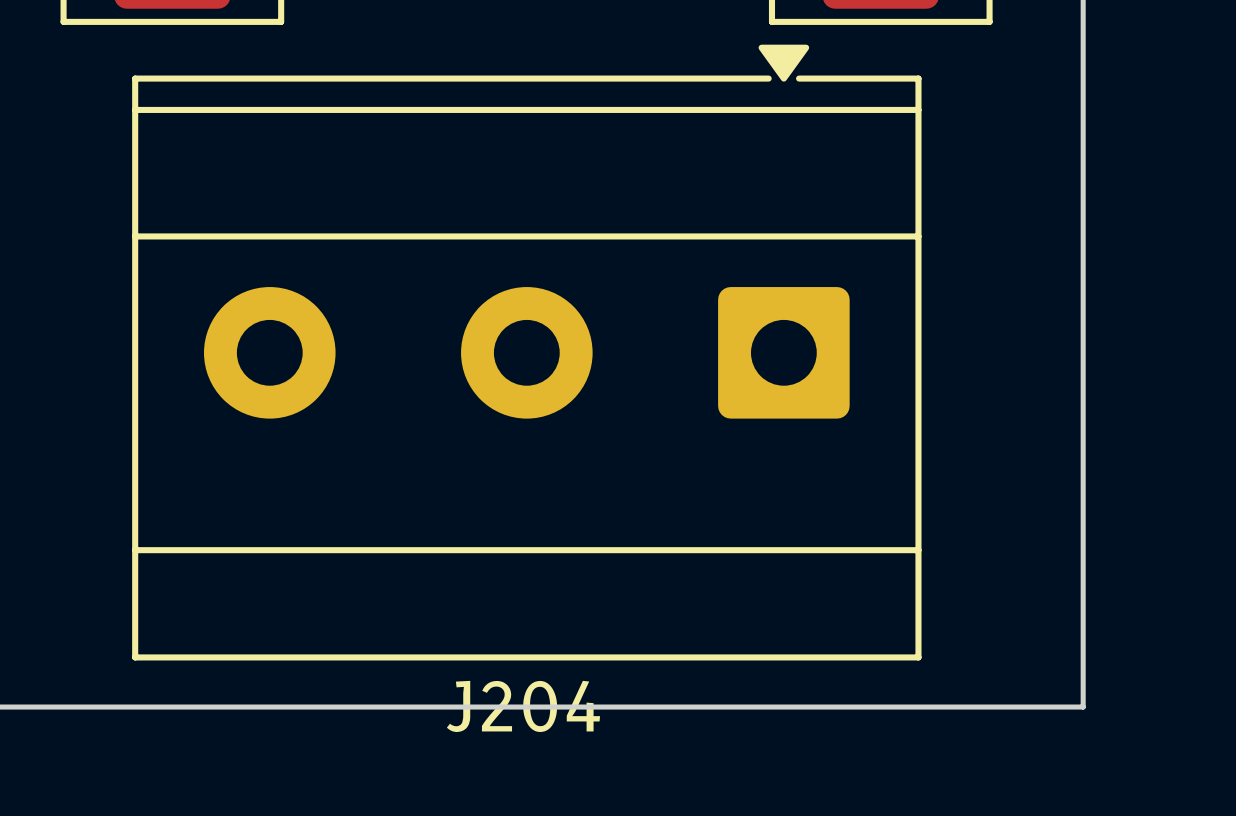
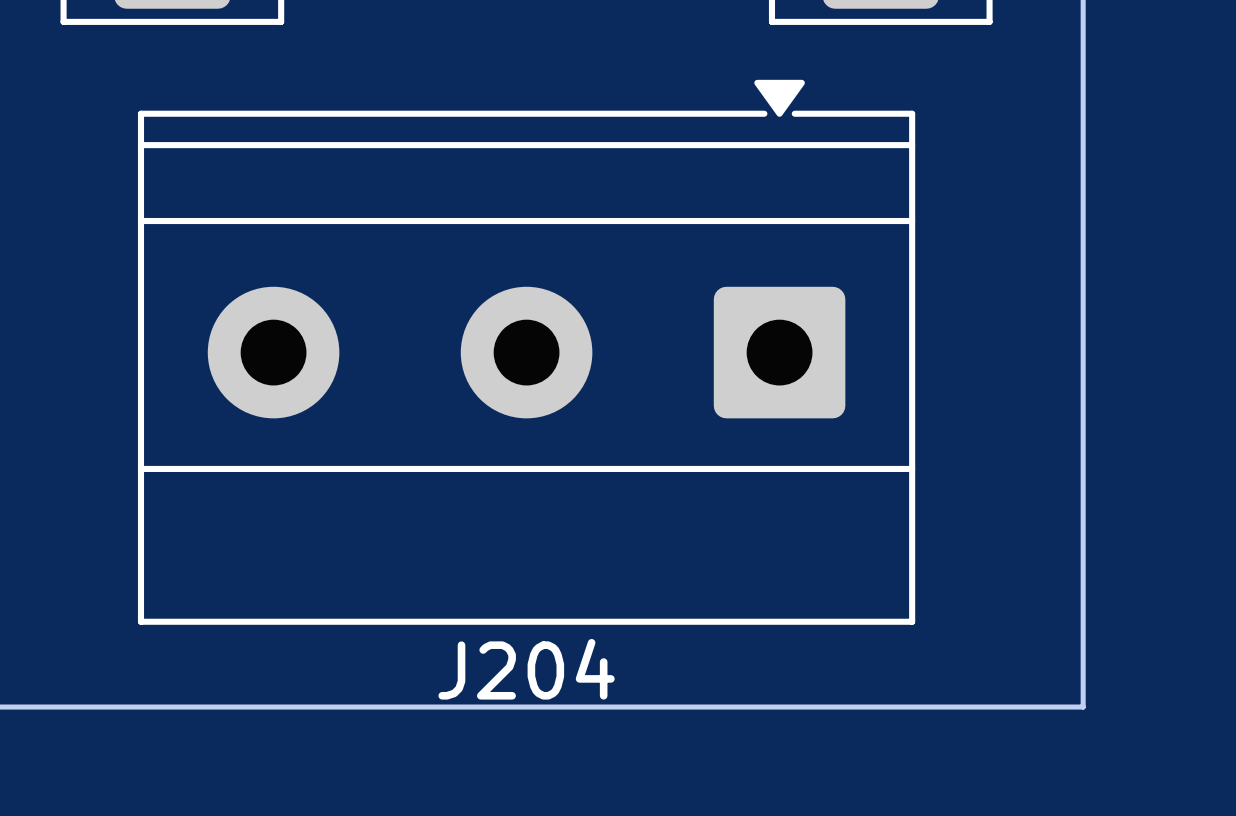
J204 footprint: [132, 44, 922, 661] -> [137, 79, 916, 625]

